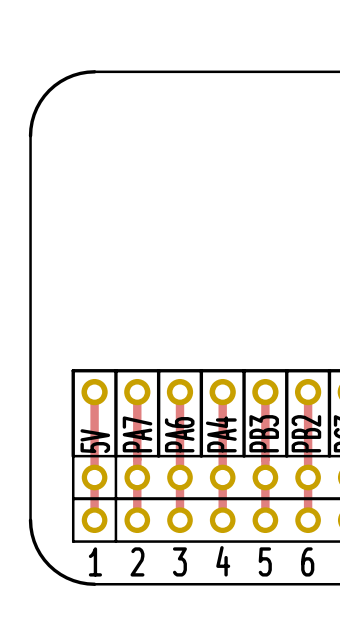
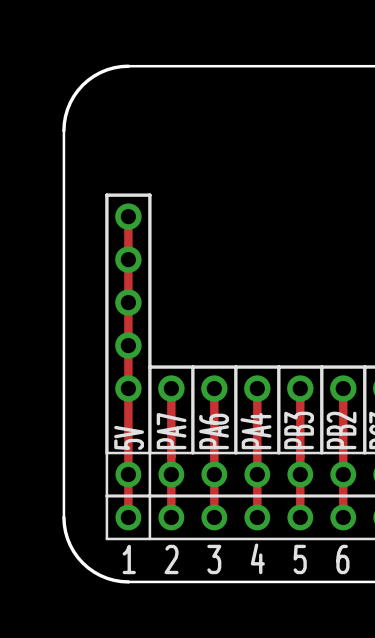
top track: none -> (128, 216) (128, 388)
part: none -> (128, 216)
part: none -> (128, 259)
part: none -> (128, 302)
part: none -> (128, 345)
line: (73, 370) (115, 370) -> (106, 367) (106, 195) (149, 195) (149, 367)

